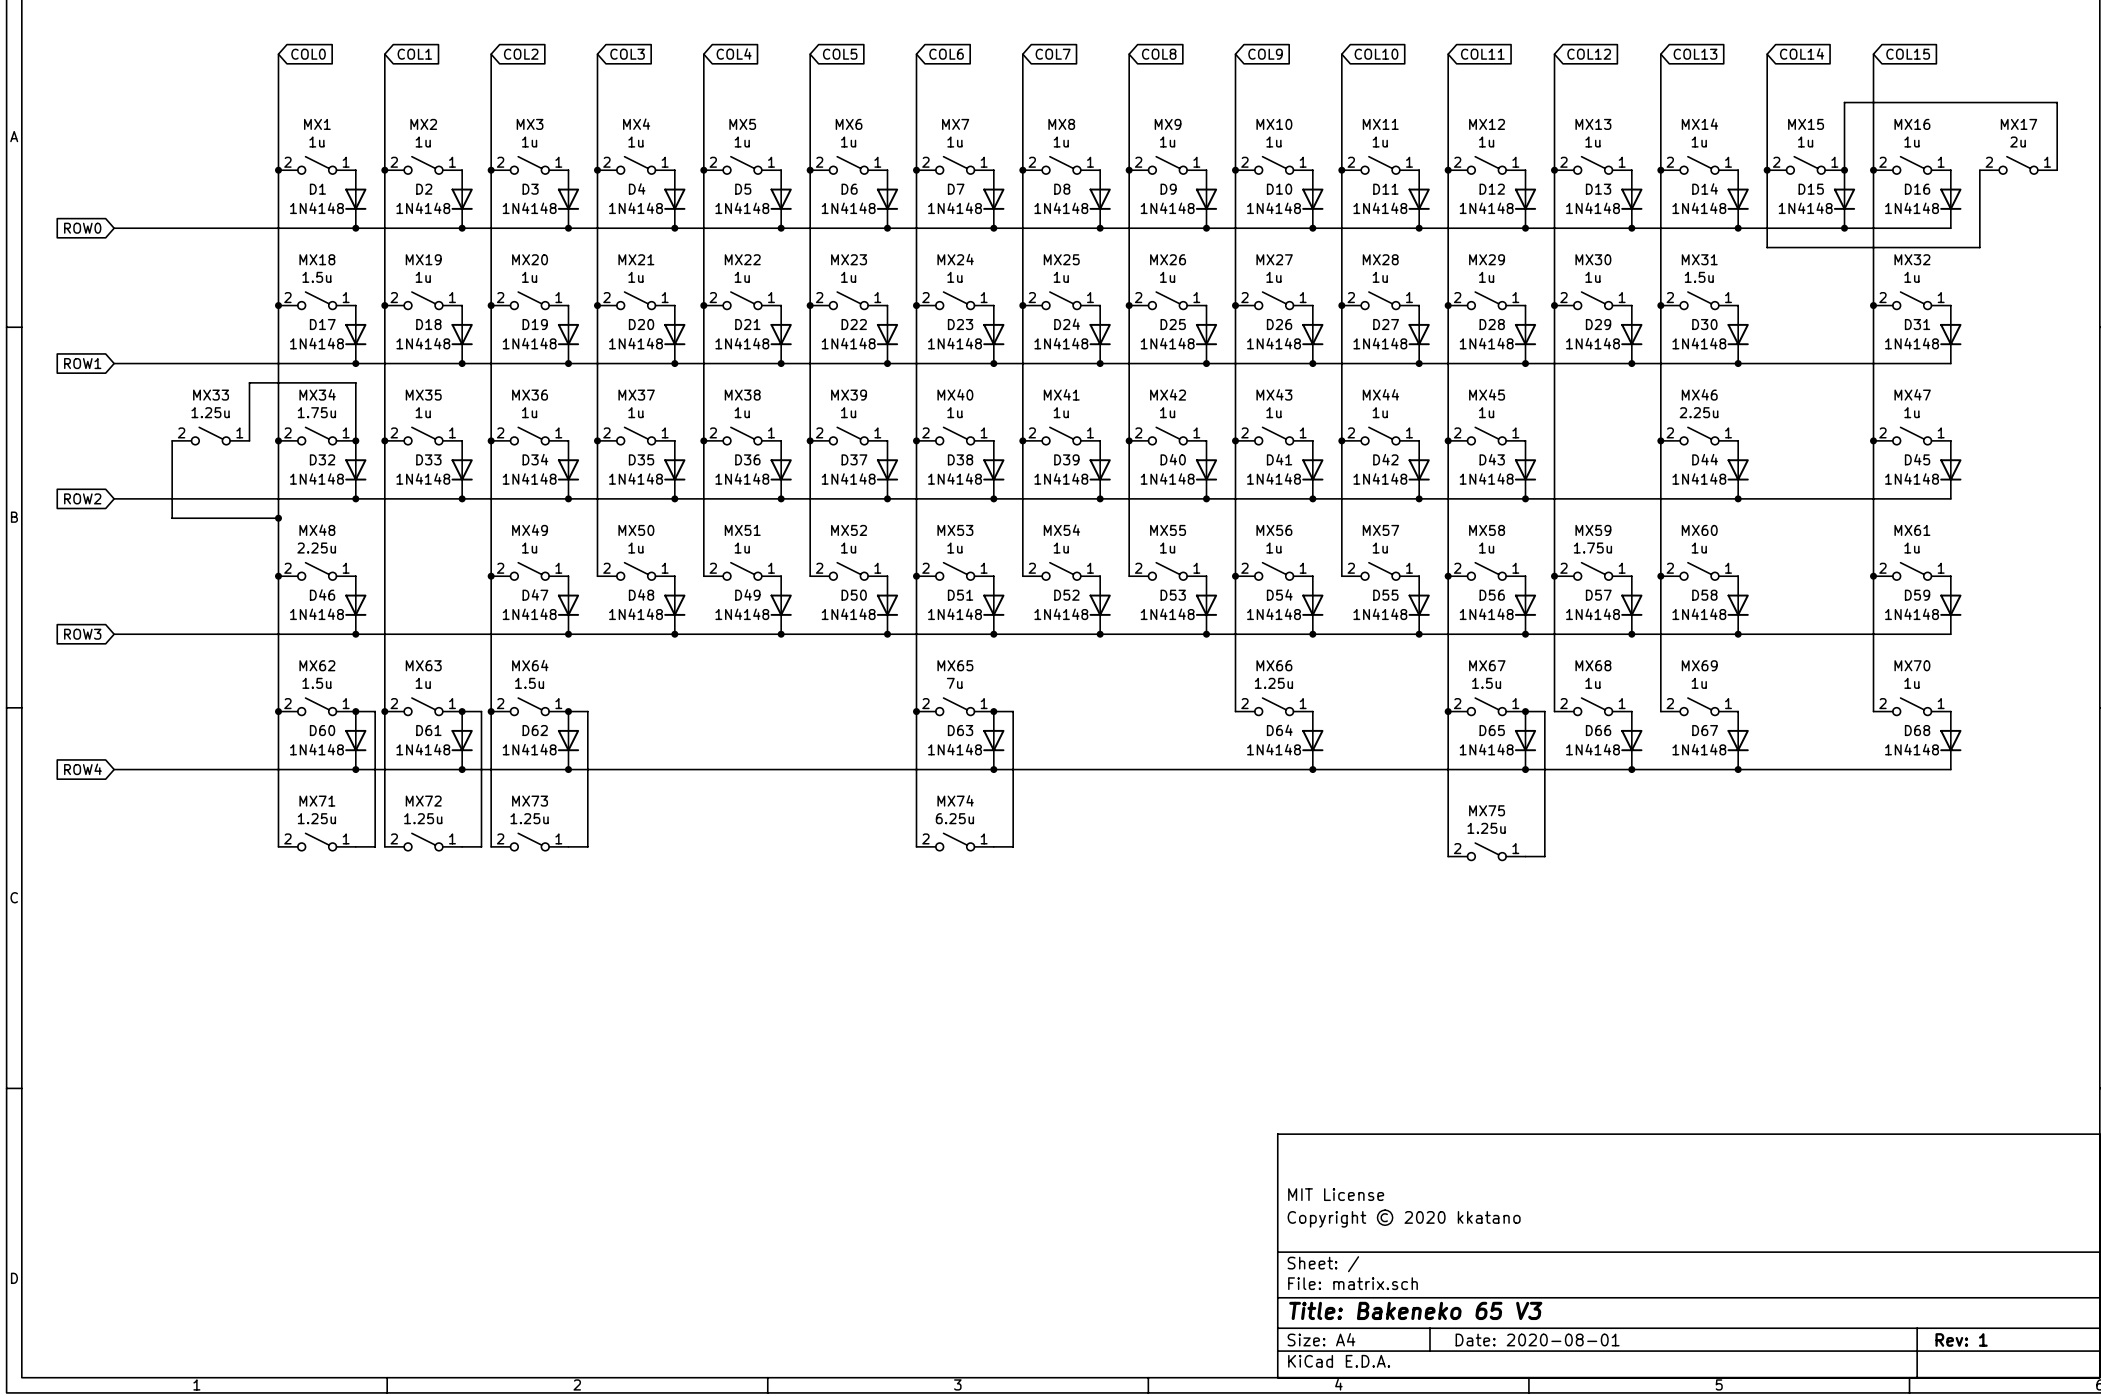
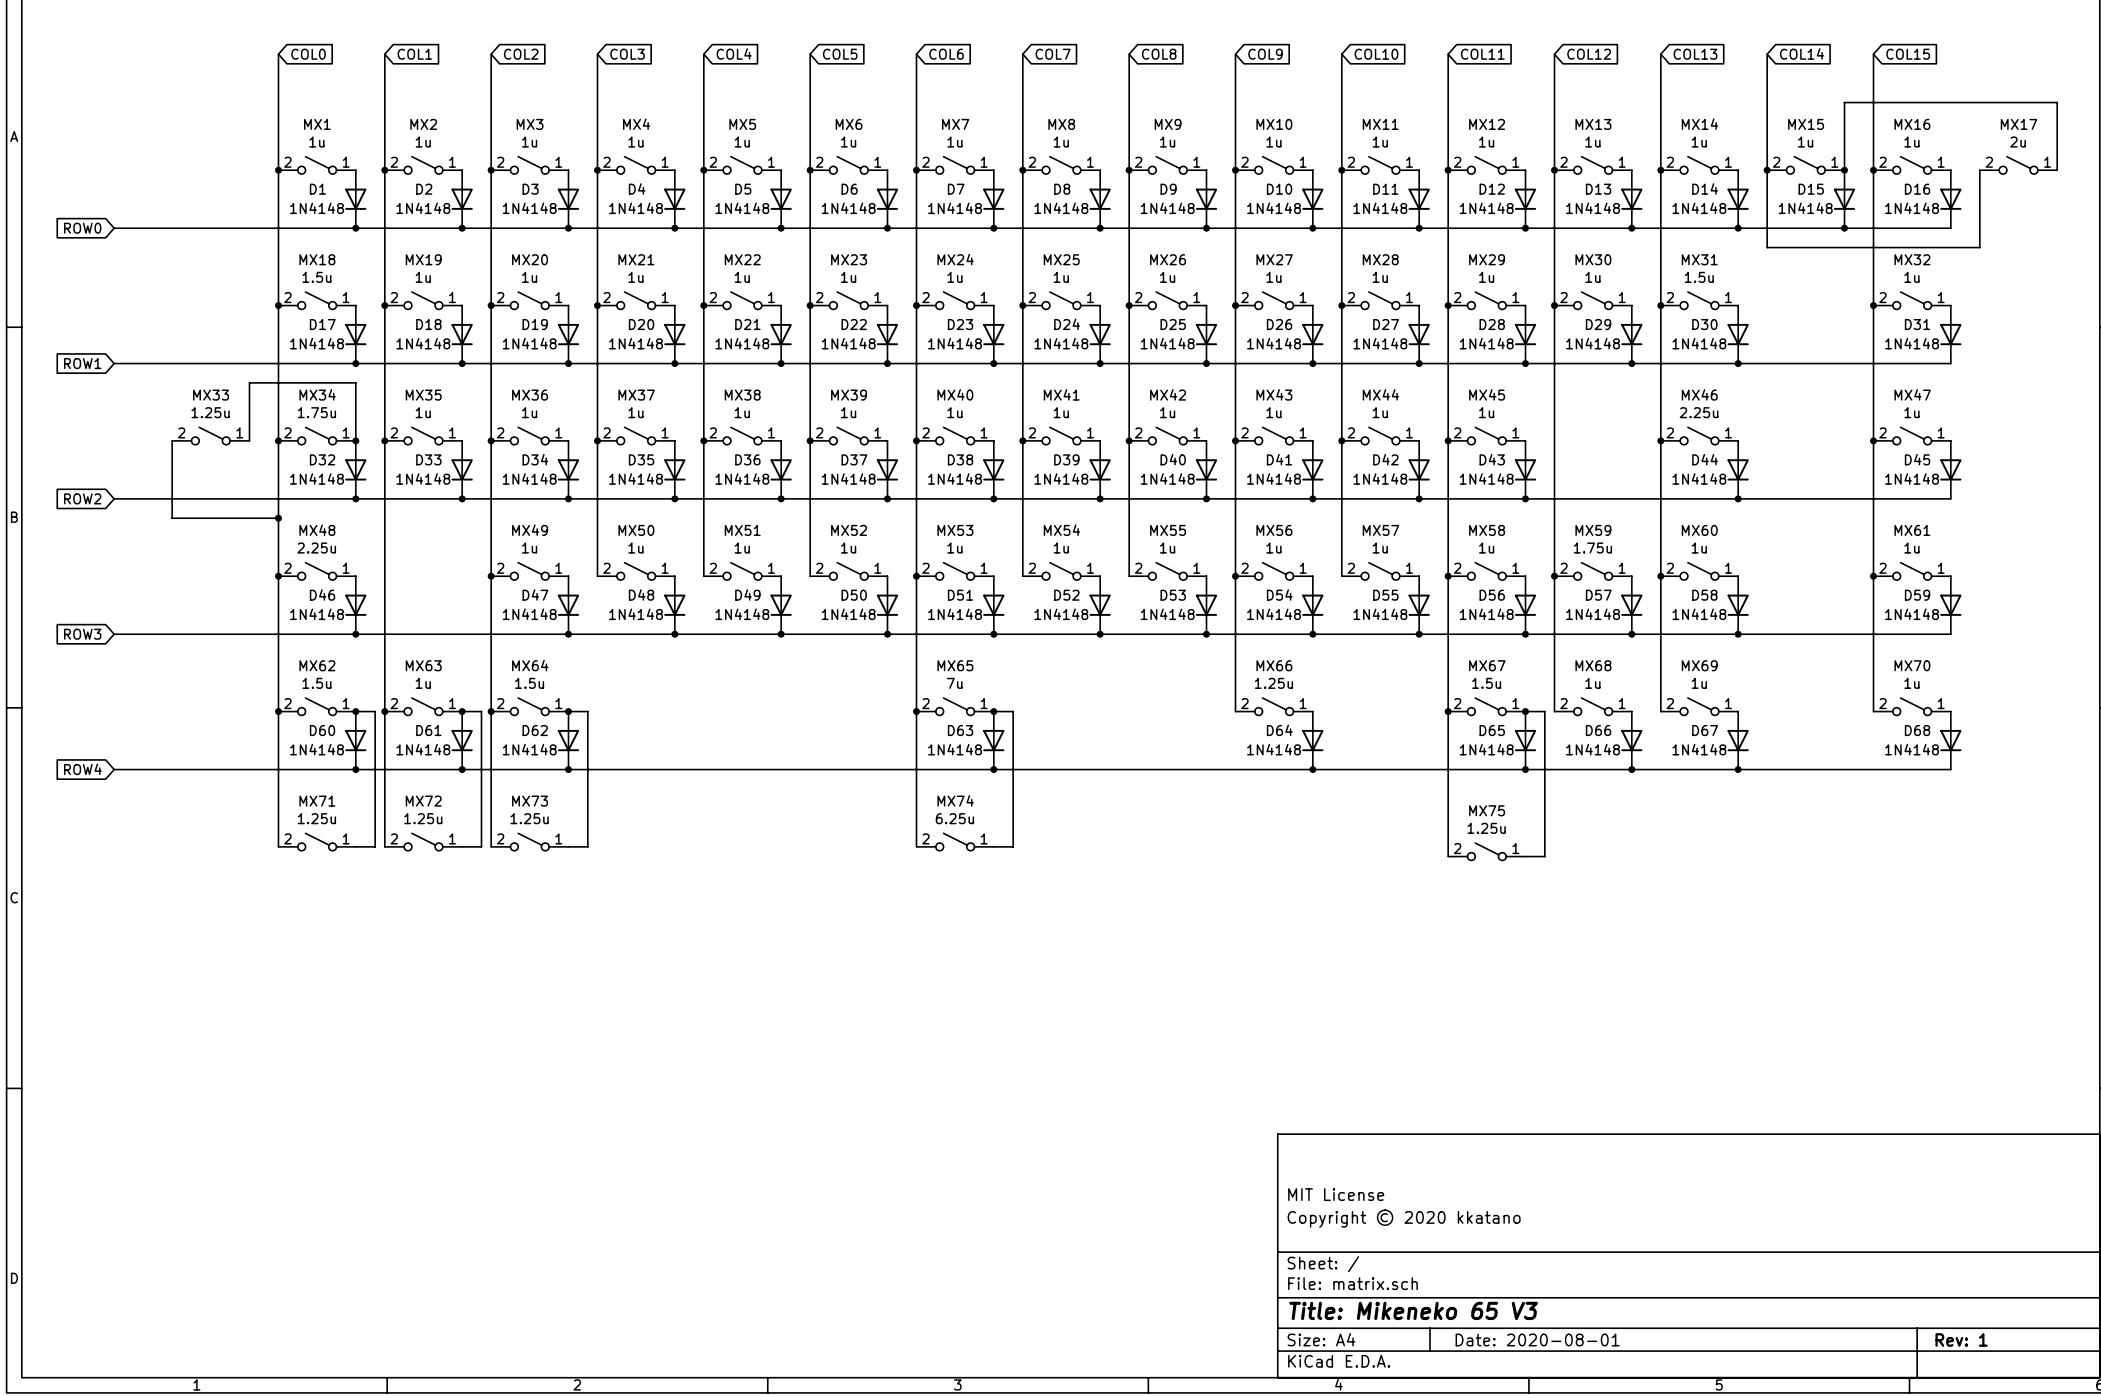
title block: Title: Bakeneko 65 V3 (1415, 1310) -> Title: Mikeneko 65 V3 (1413, 1310)

